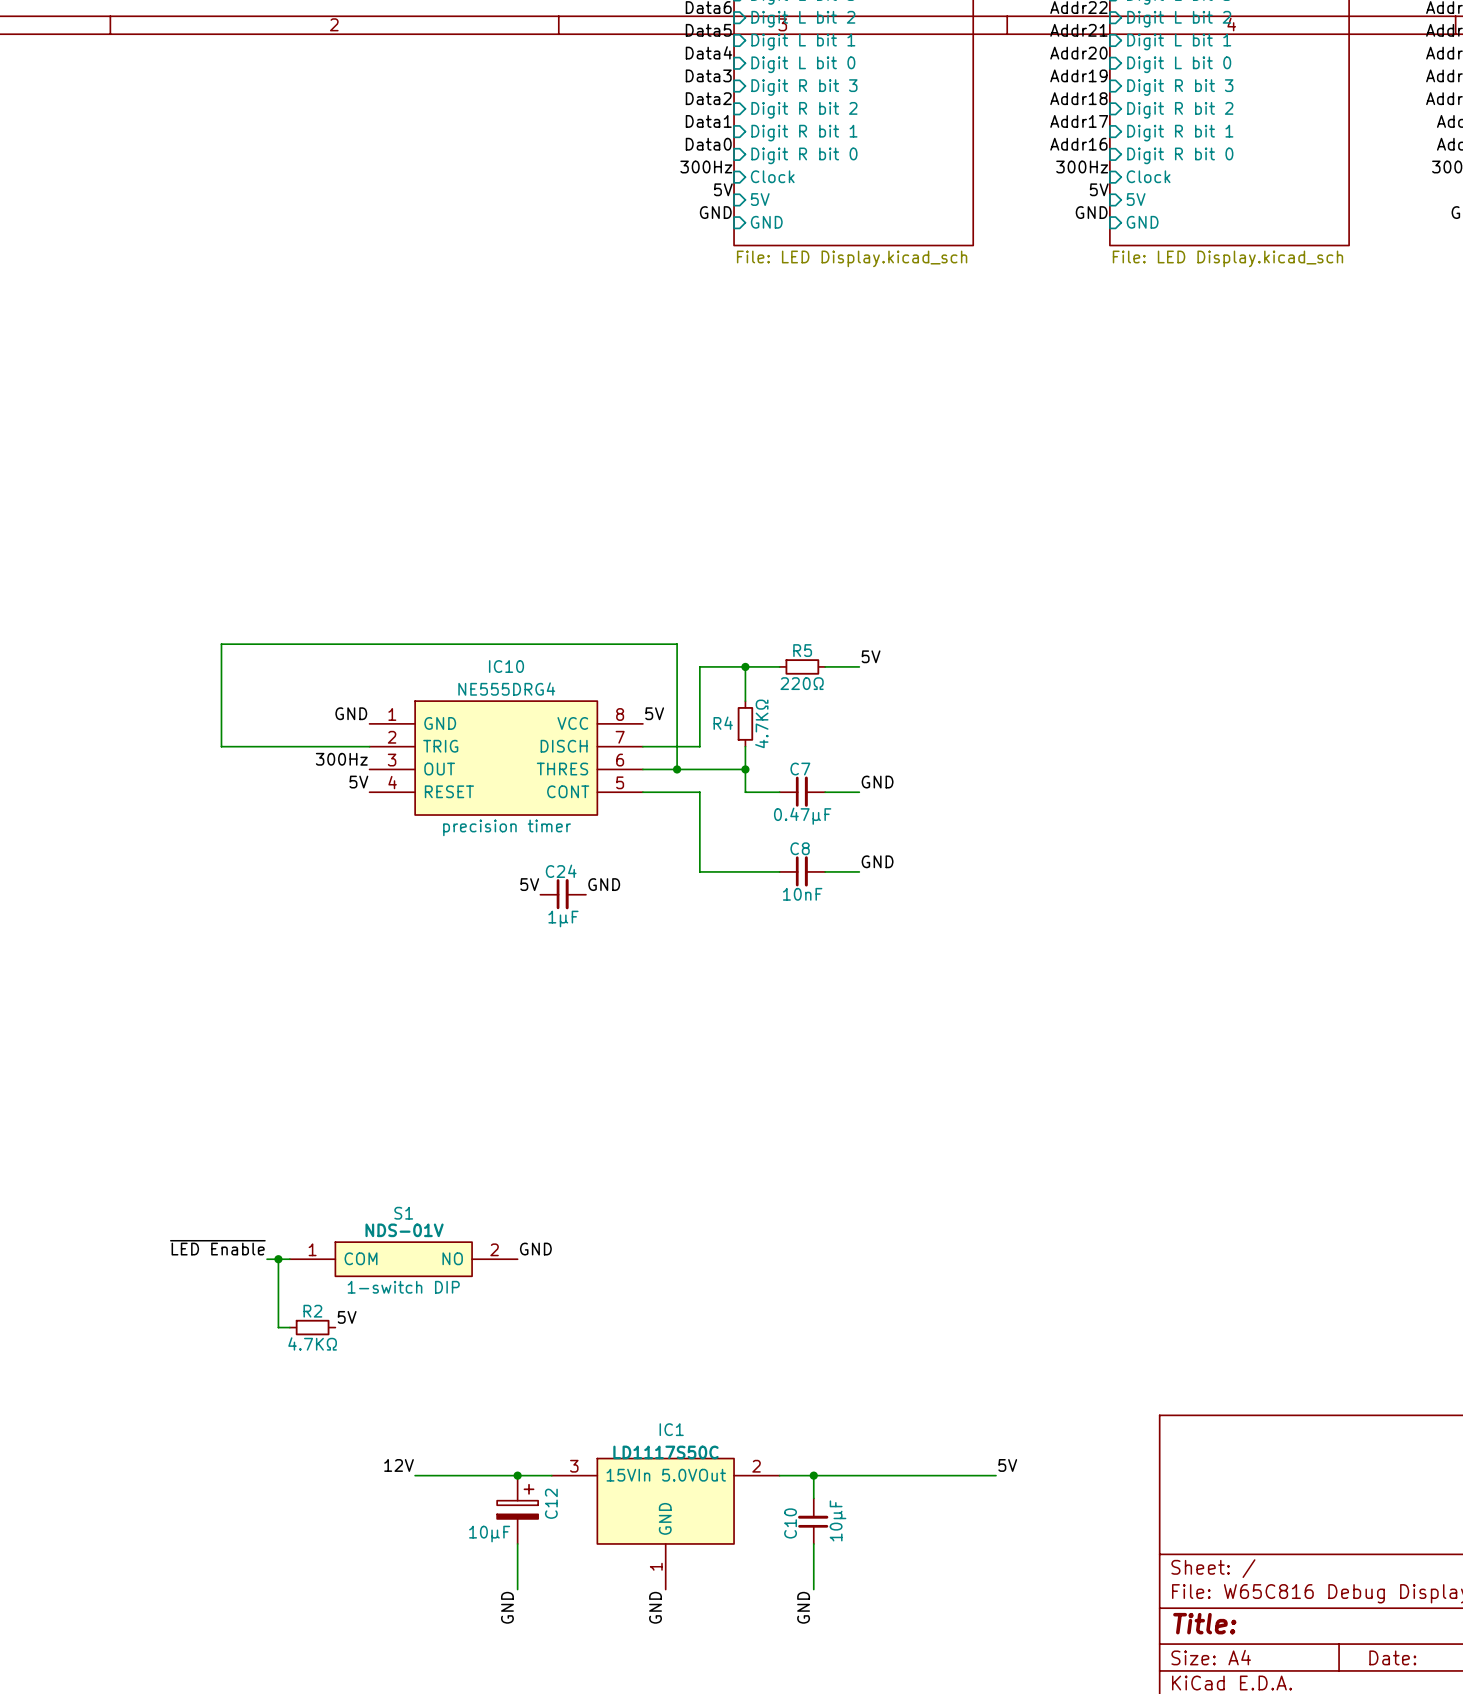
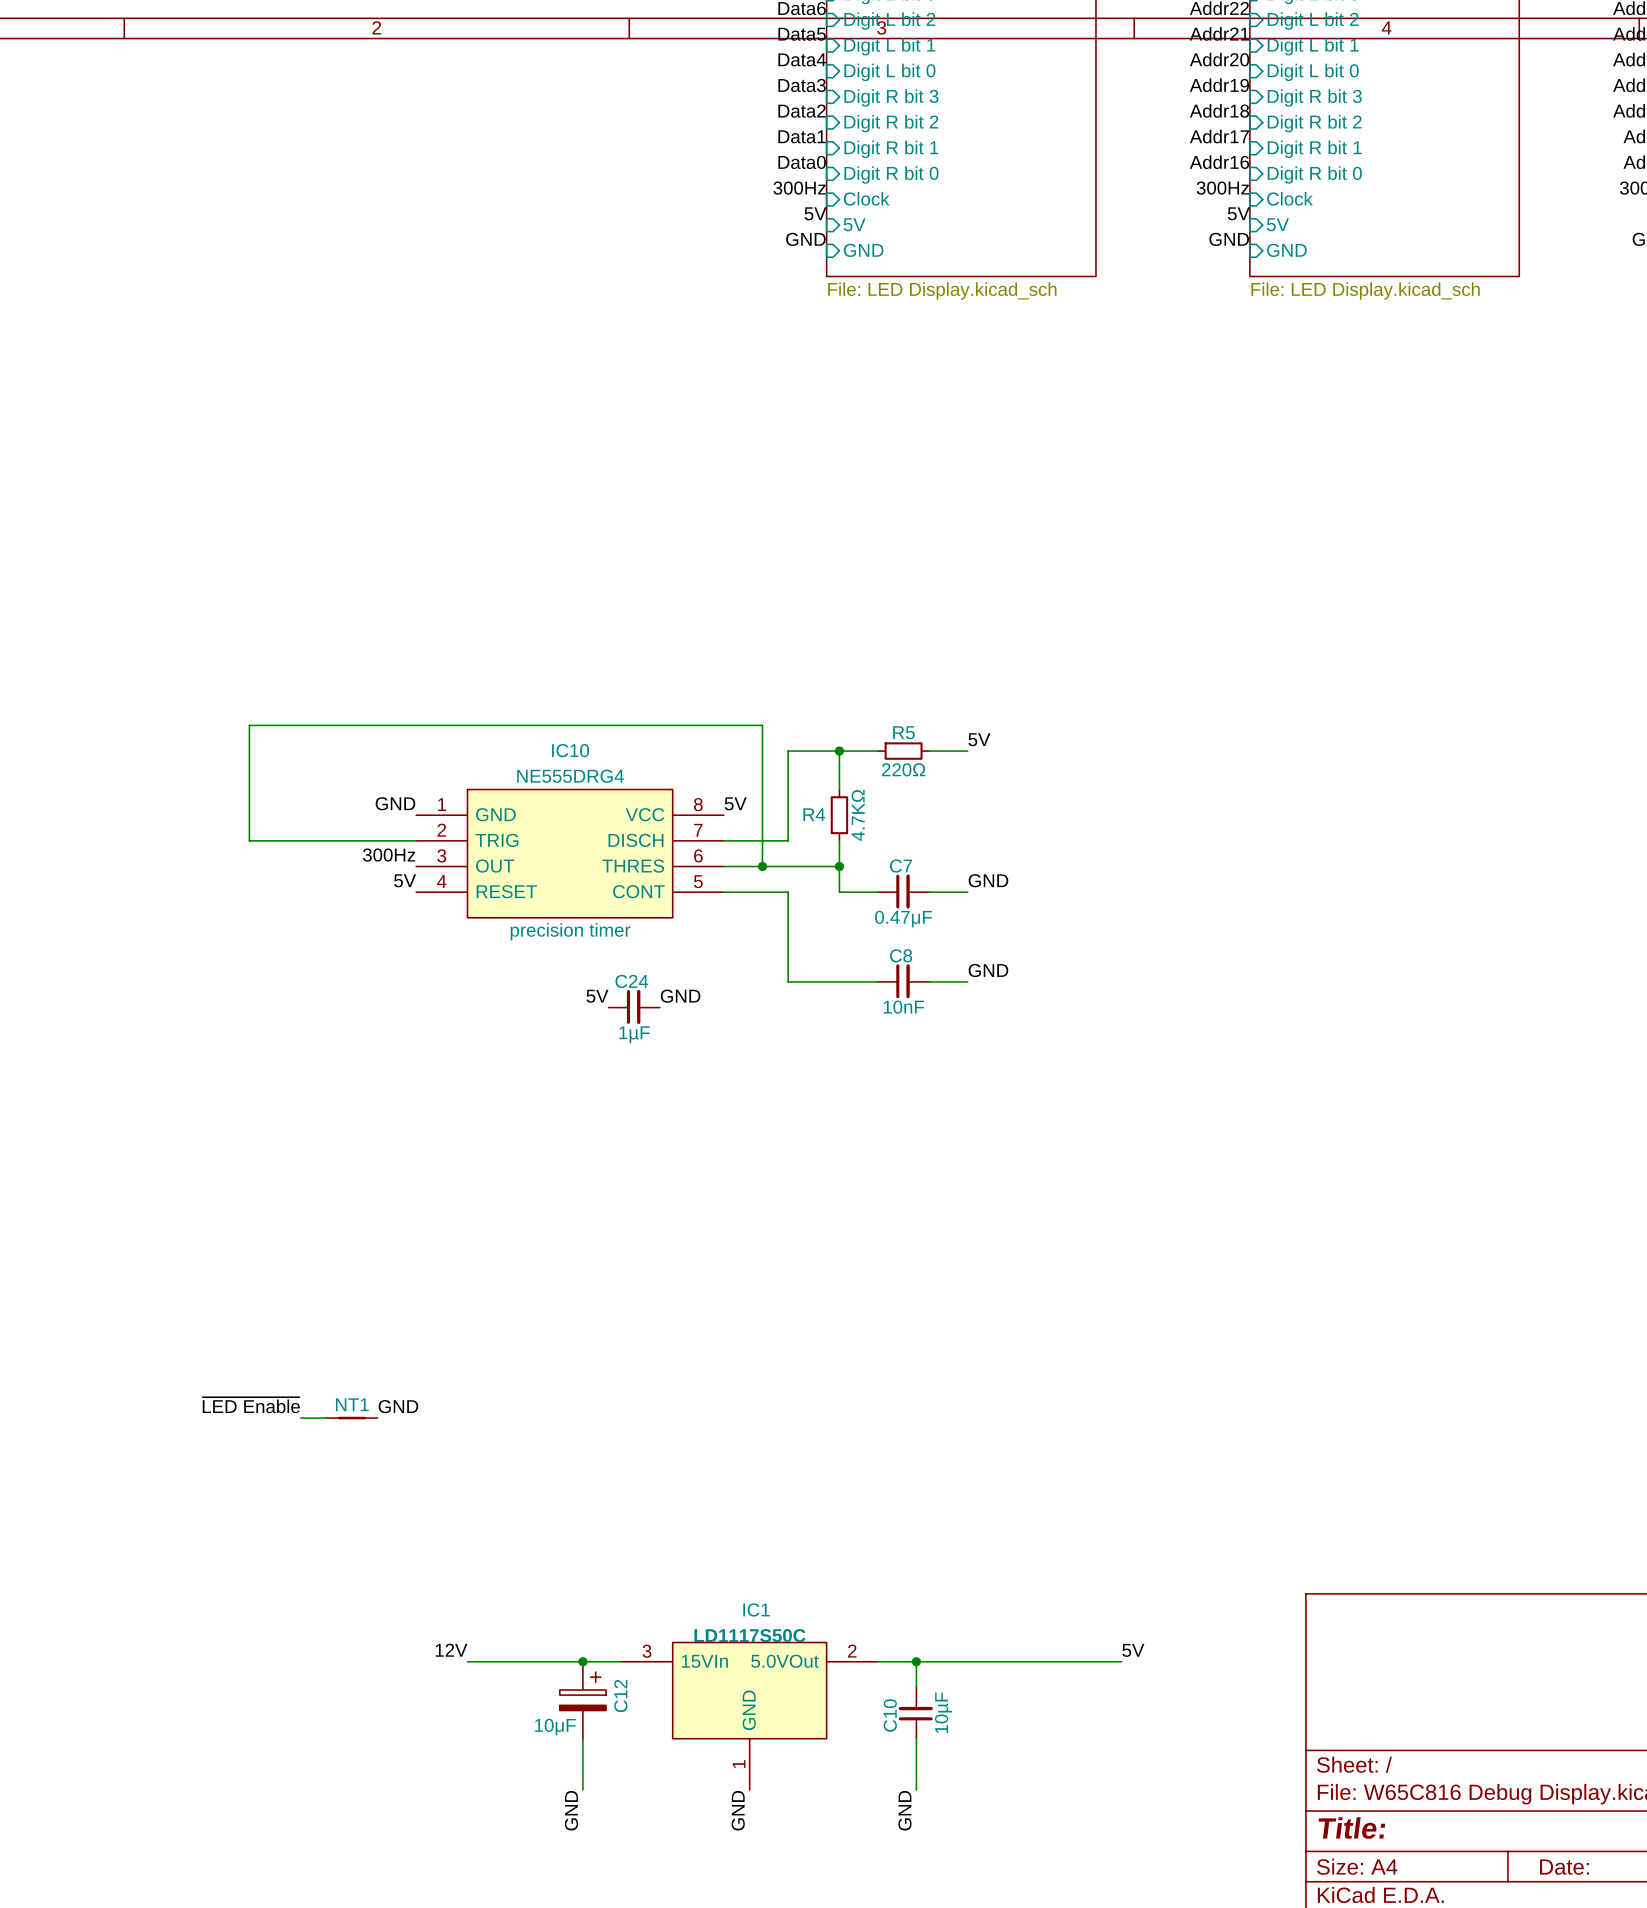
label position: GND (535, 1249) -> GND (398, 1406)
wire: (278, 1259) (278, 1327) (289, 1327) -> none
junction: (278, 1259) -> none
NT1: none -> (352, 1418)
S1: NDS-01V (403, 1259) -> none
label: 5V (347, 1317) -> none
R2: 4.7KΩ (312, 1327) -> none

